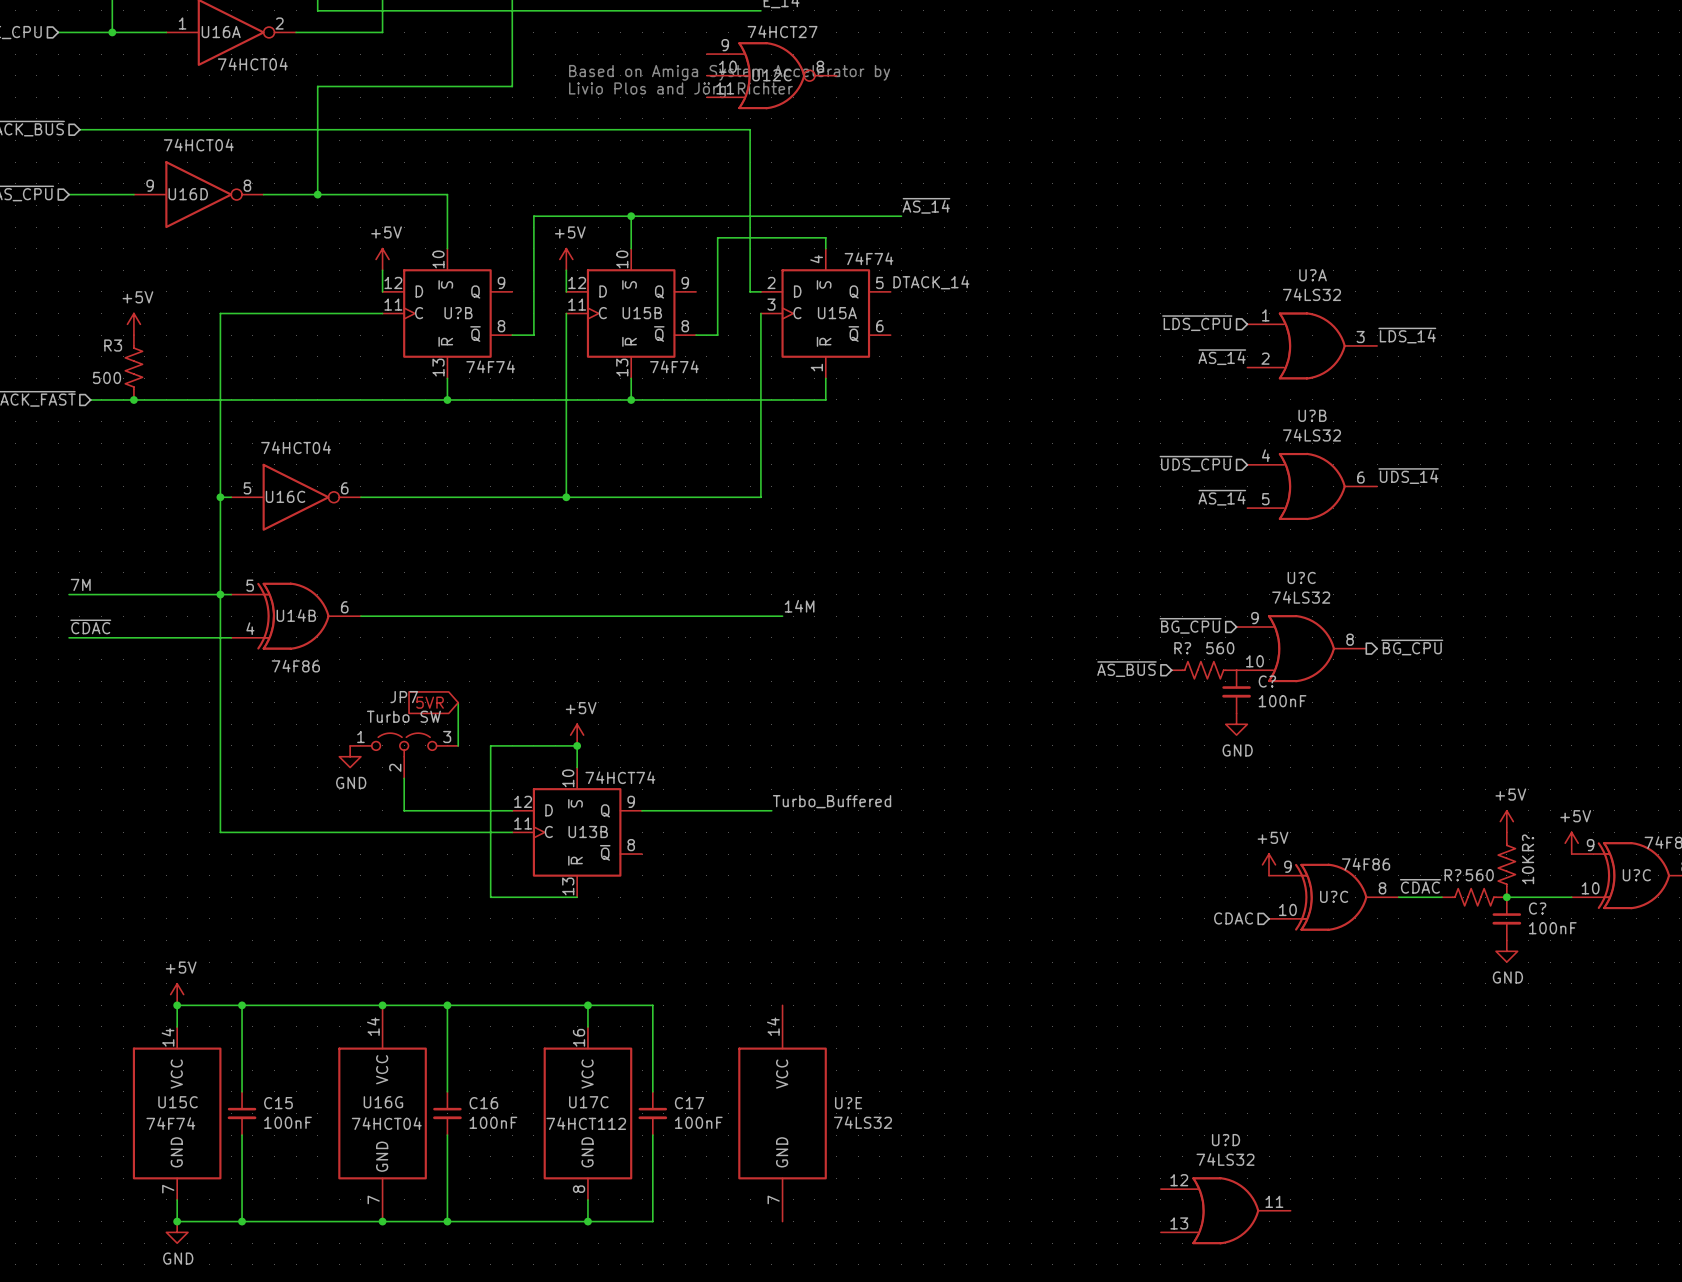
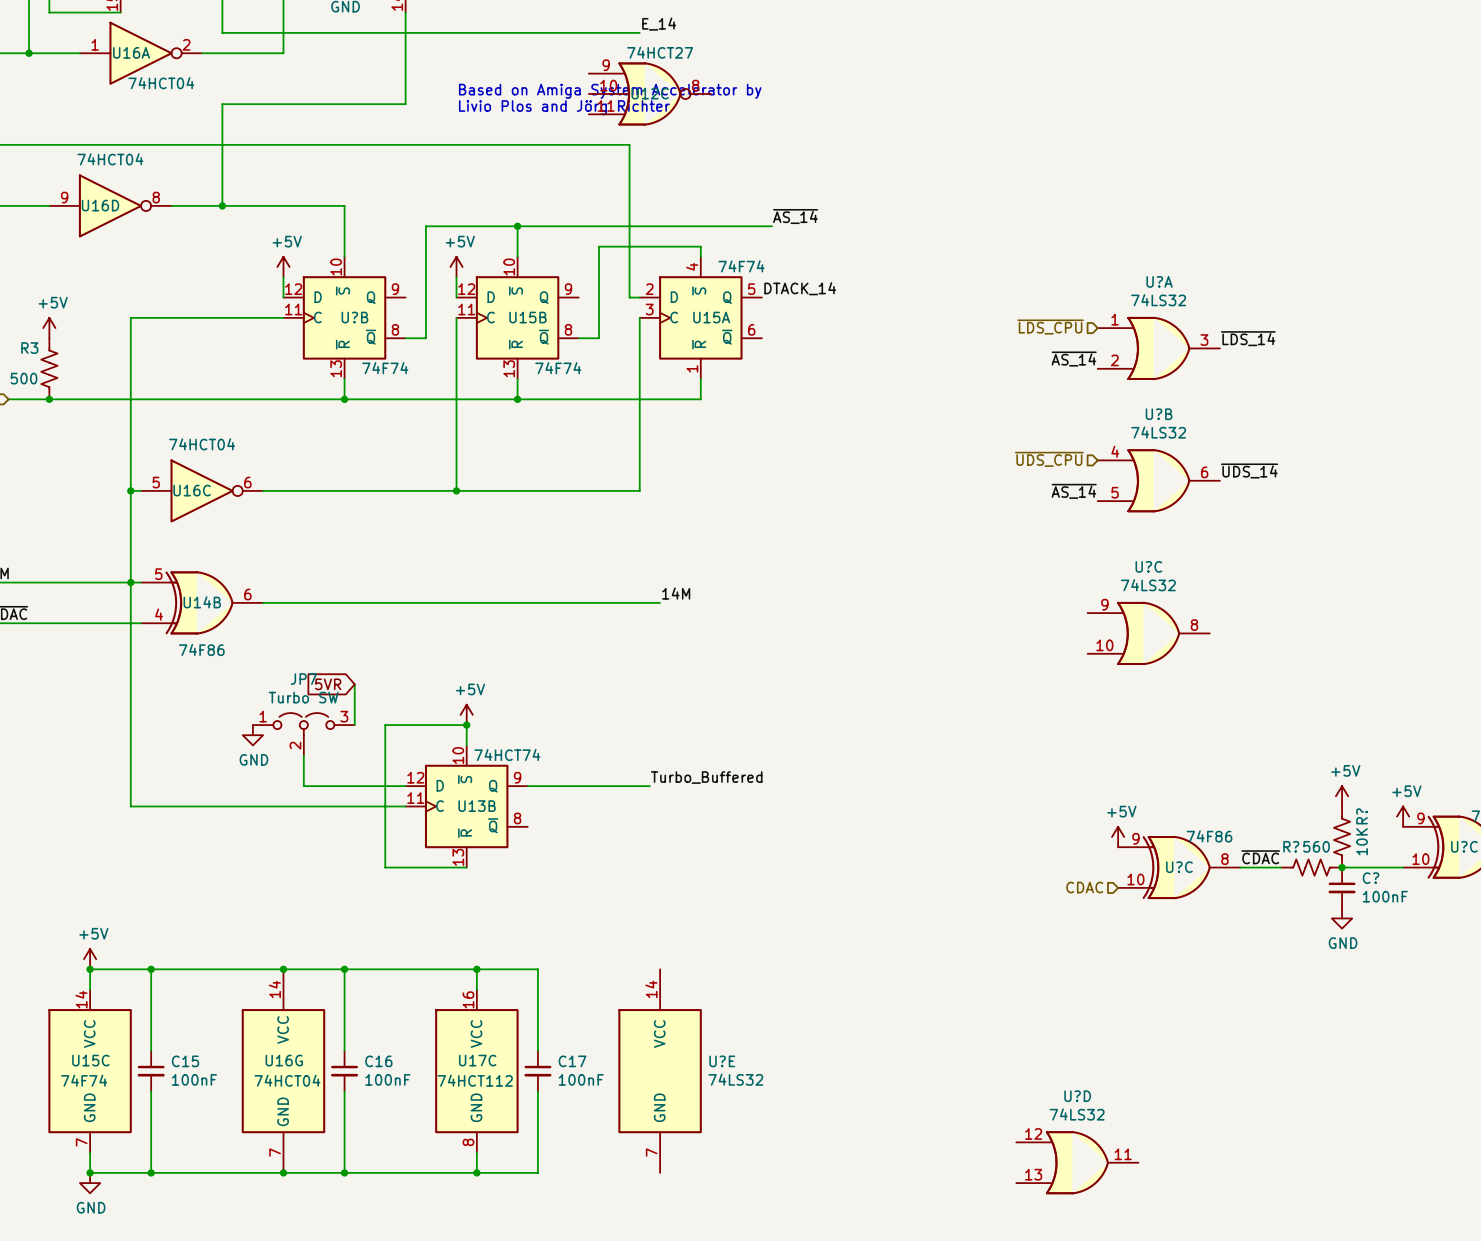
hierarchical label: ~{BG_CPU} (1190, 625) -> none
hierarchical label: ~{BG_CPU} (1412, 647) -> none
hierarchical label: ~{AS_BUS} (1126, 669) -> none
R?: 560 (1204, 670) -> none
C?: 100nF (1236, 691) -> none
power symbol: GND (1236, 724) -> none

